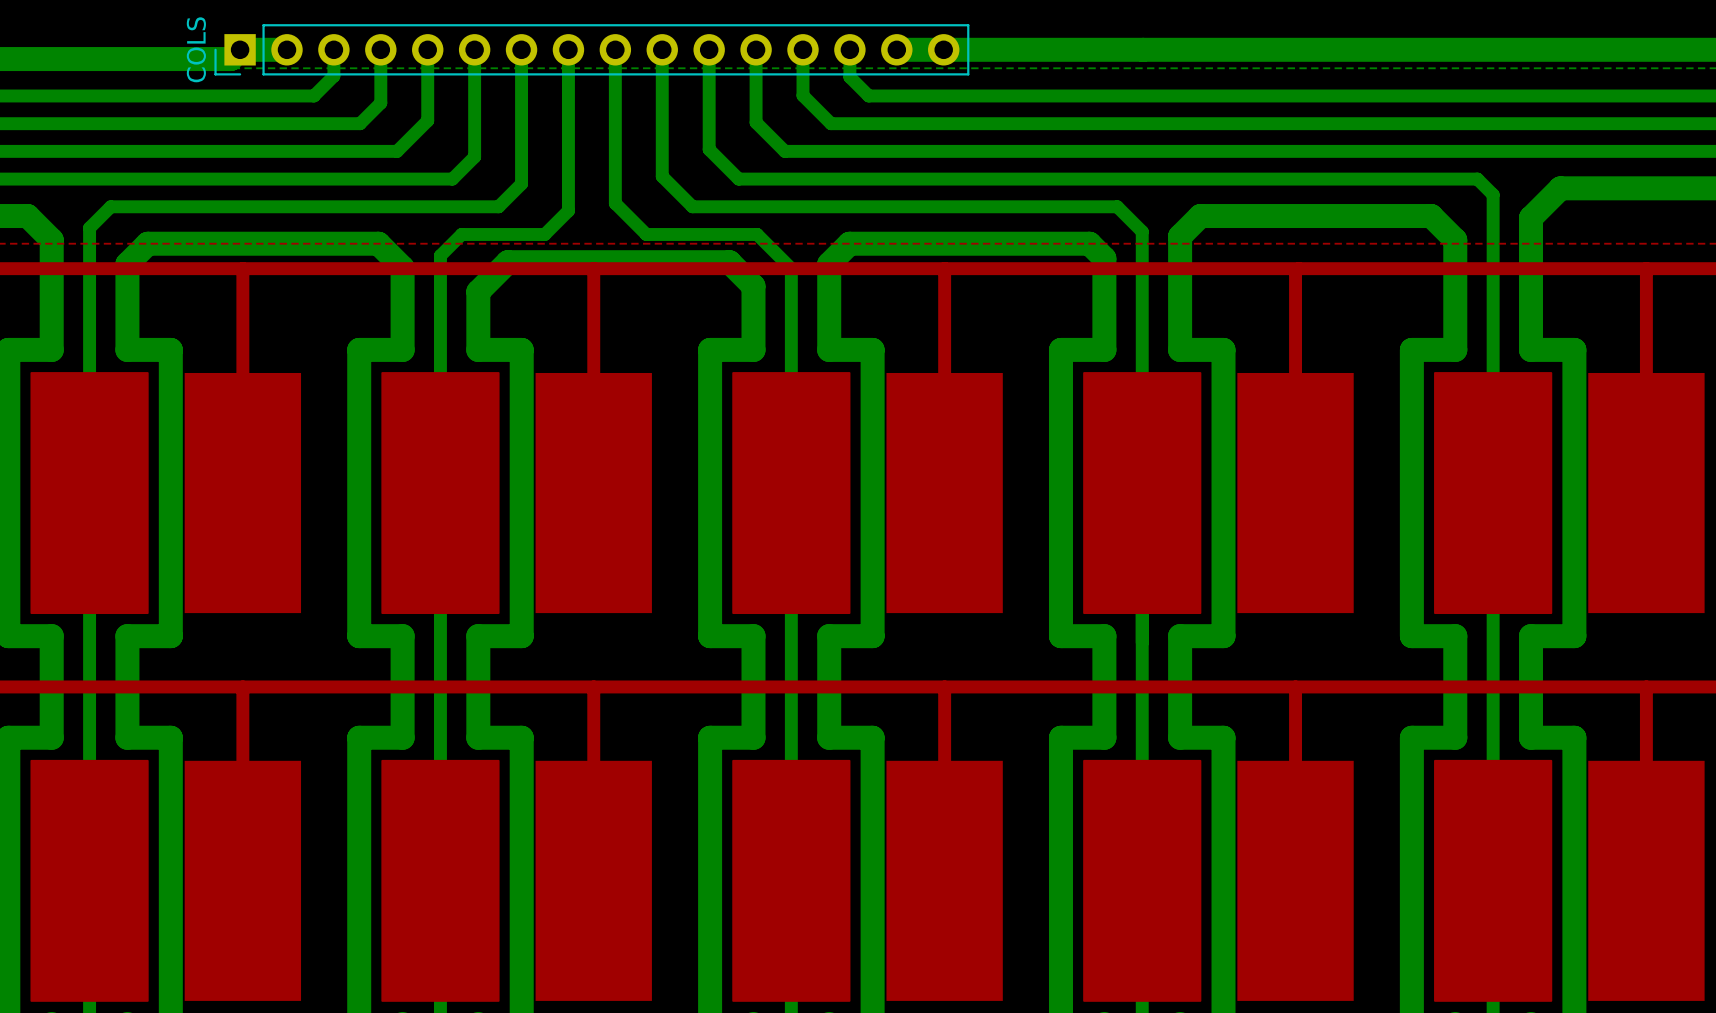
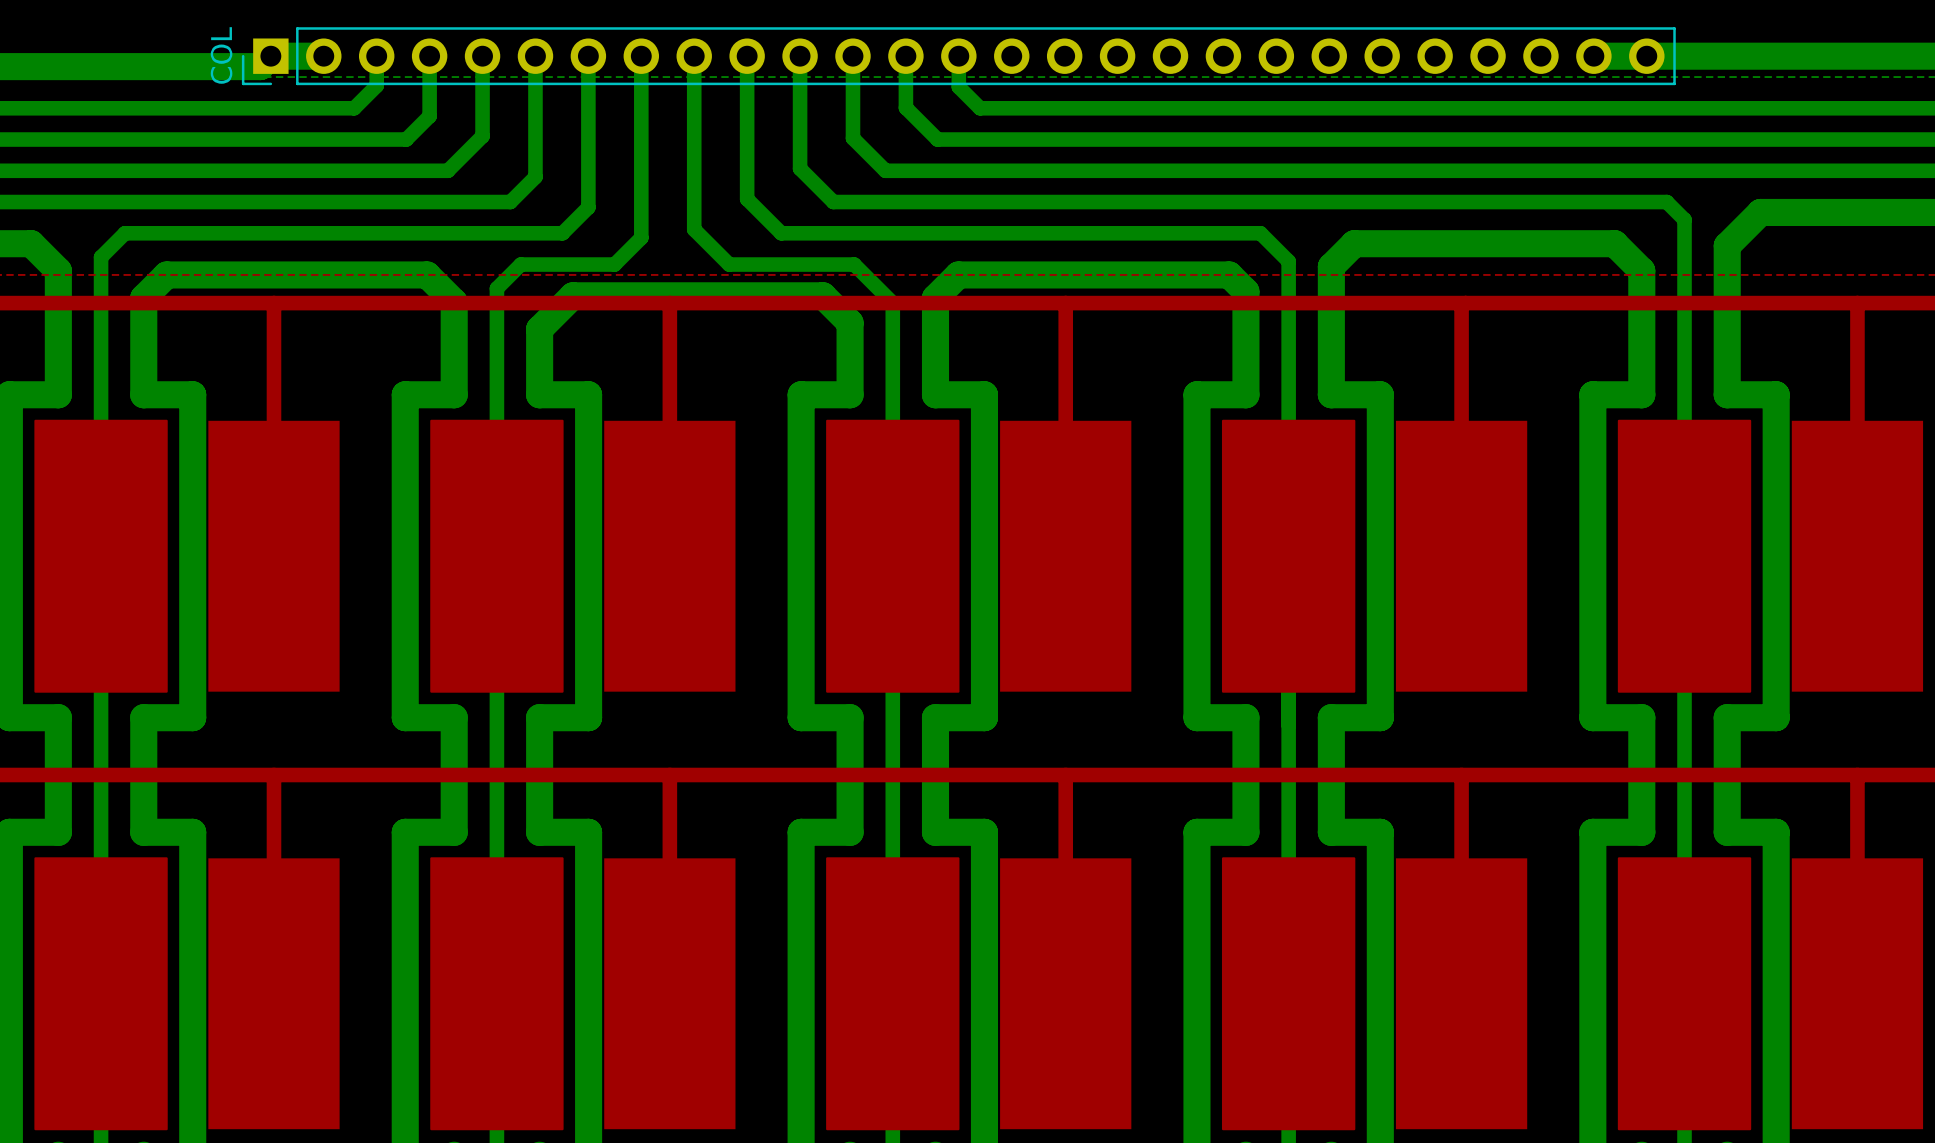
COLS: (591, 49) -> none
COL: none -> (958, 56)
bottom track: (896, 49) (1412, 49) -> none

